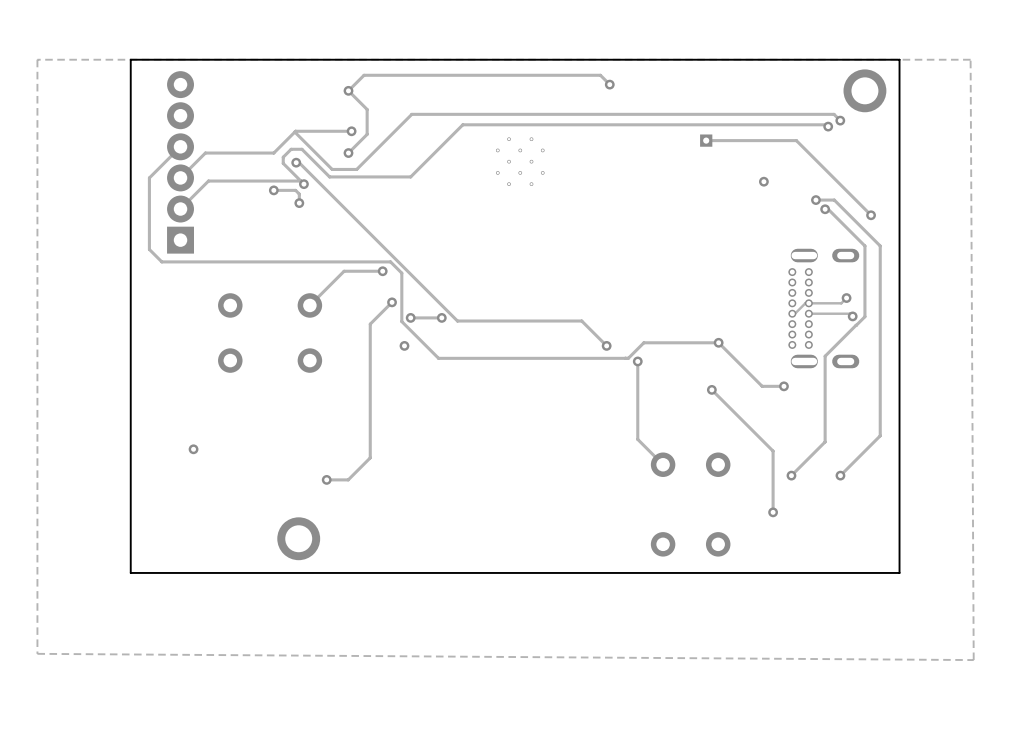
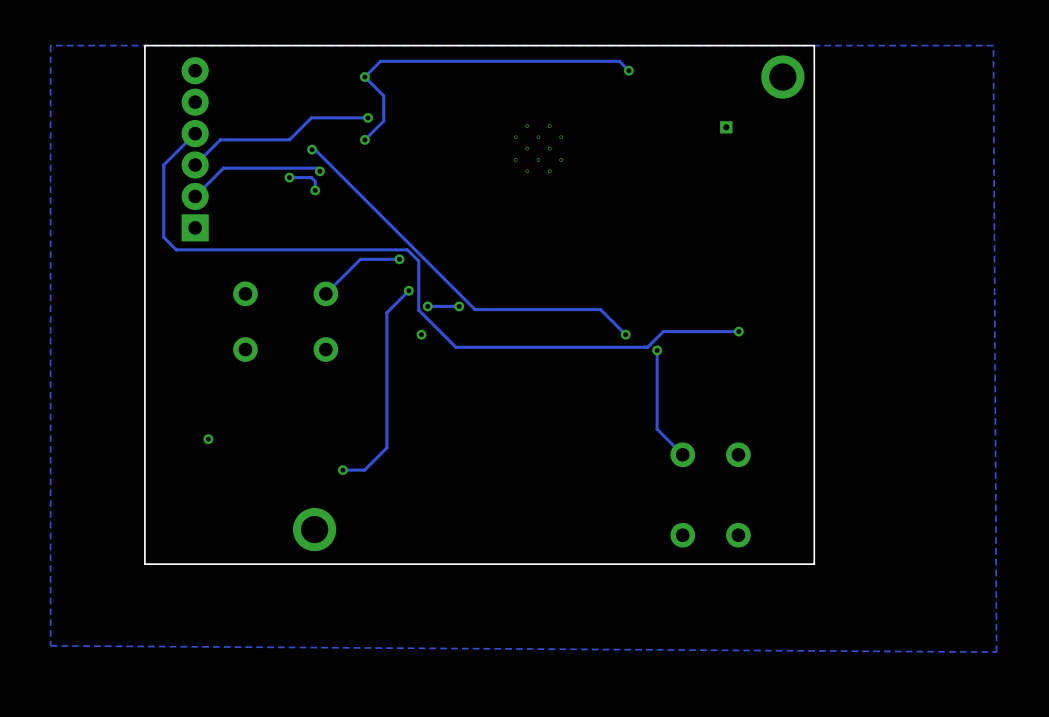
board edge: (793, 59) (899, 59) (899, 572) (793, 572) -> (814, 45) (814, 564)
part position: (864, 90) -> (782, 77)
track: (840, 120) (834, 114) (411, 114) (356, 169) (332, 169) (294, 132) -> none
via: (840, 120) -> none
track: (824, 124) (462, 124) (410, 176) (329, 176) (301, 149) (291, 149) (283, 157) (283, 163) (300, 181) -> none
via: (828, 126) -> none
track: (706, 140) (796, 140) (871, 215) -> none
via: (763, 181) -> none
track: (815, 200) (834, 200) (880, 245) (880, 435) (840, 475) -> none
via: (815, 200) -> none
track: (825, 209) (828, 209) (864, 245) (864, 316) (825, 356) (825, 441) (791, 475) -> none
via: (825, 209) -> none
via: (871, 215) -> none
track: (846, 298) (841, 303) (805, 303) (794, 313) (792, 313) -> none
via: (846, 298) -> none
part: (823, 308) -> none
track: (808, 313) (850, 313) (852, 316) -> none
via: (852, 316) -> none
track: (718, 342) (762, 386) (783, 386) -> none
via: (783, 386) -> none
track: (711, 389) (773, 451) (773, 512) -> none
via: (711, 389) -> none
via: (791, 475) -> none
via: (840, 475) -> none
via: (773, 512) -> none

